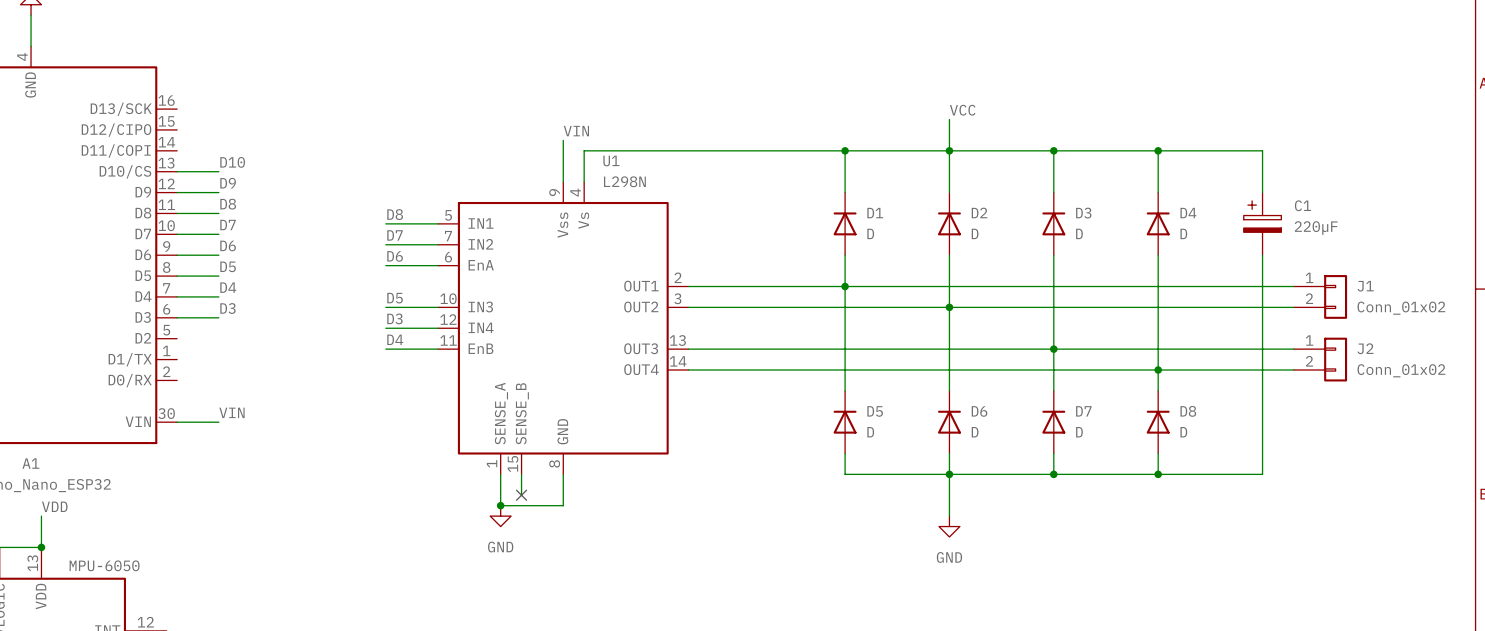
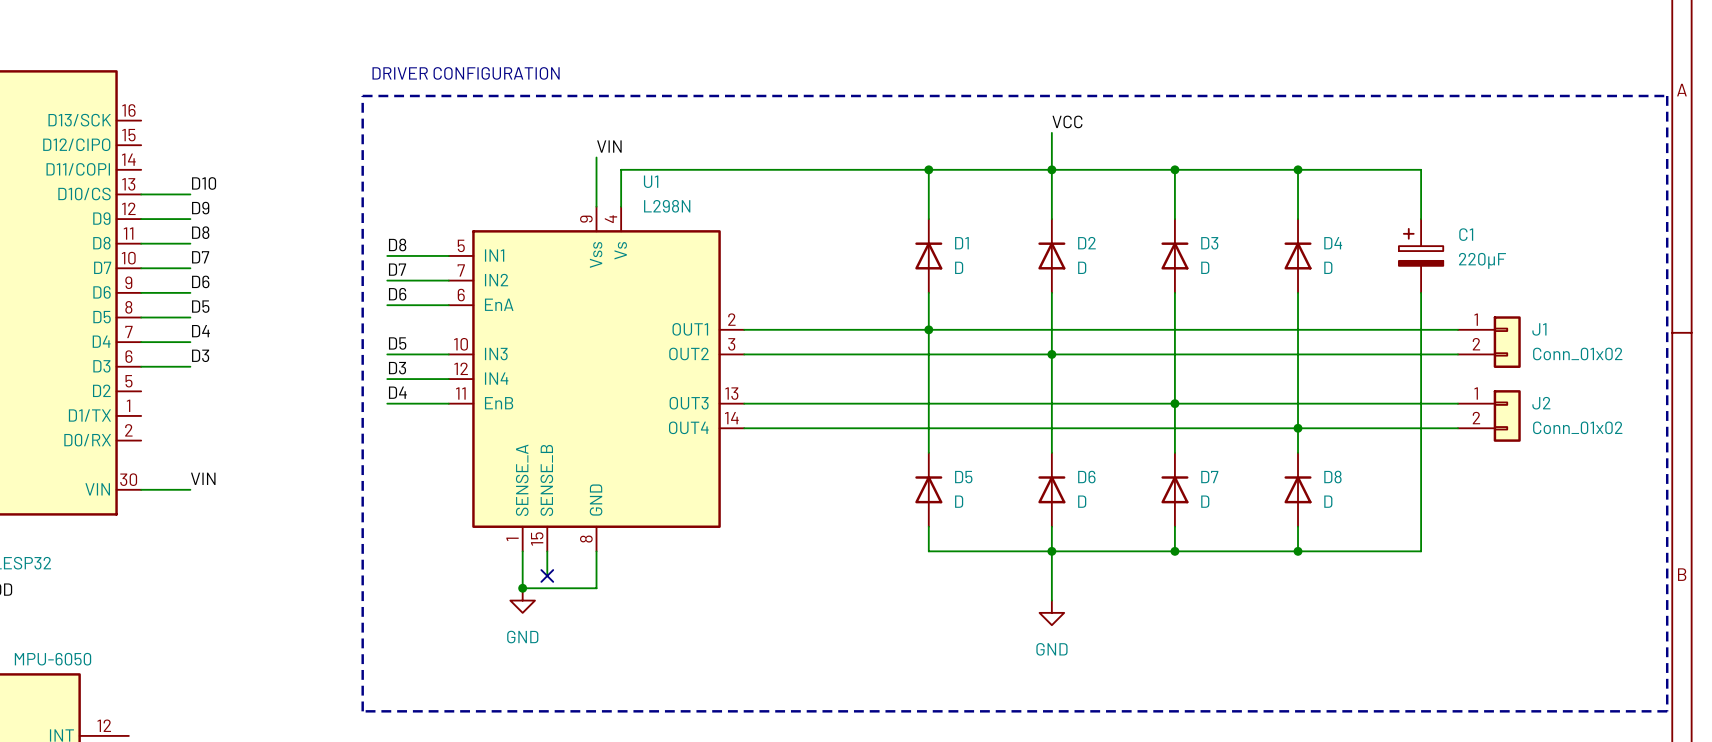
text: none -> DRIVER CONFIGURATION (466, 73)
line: none -> (362, 95) (1667, 95) (1667, 711) (362, 711) (362, 95)

